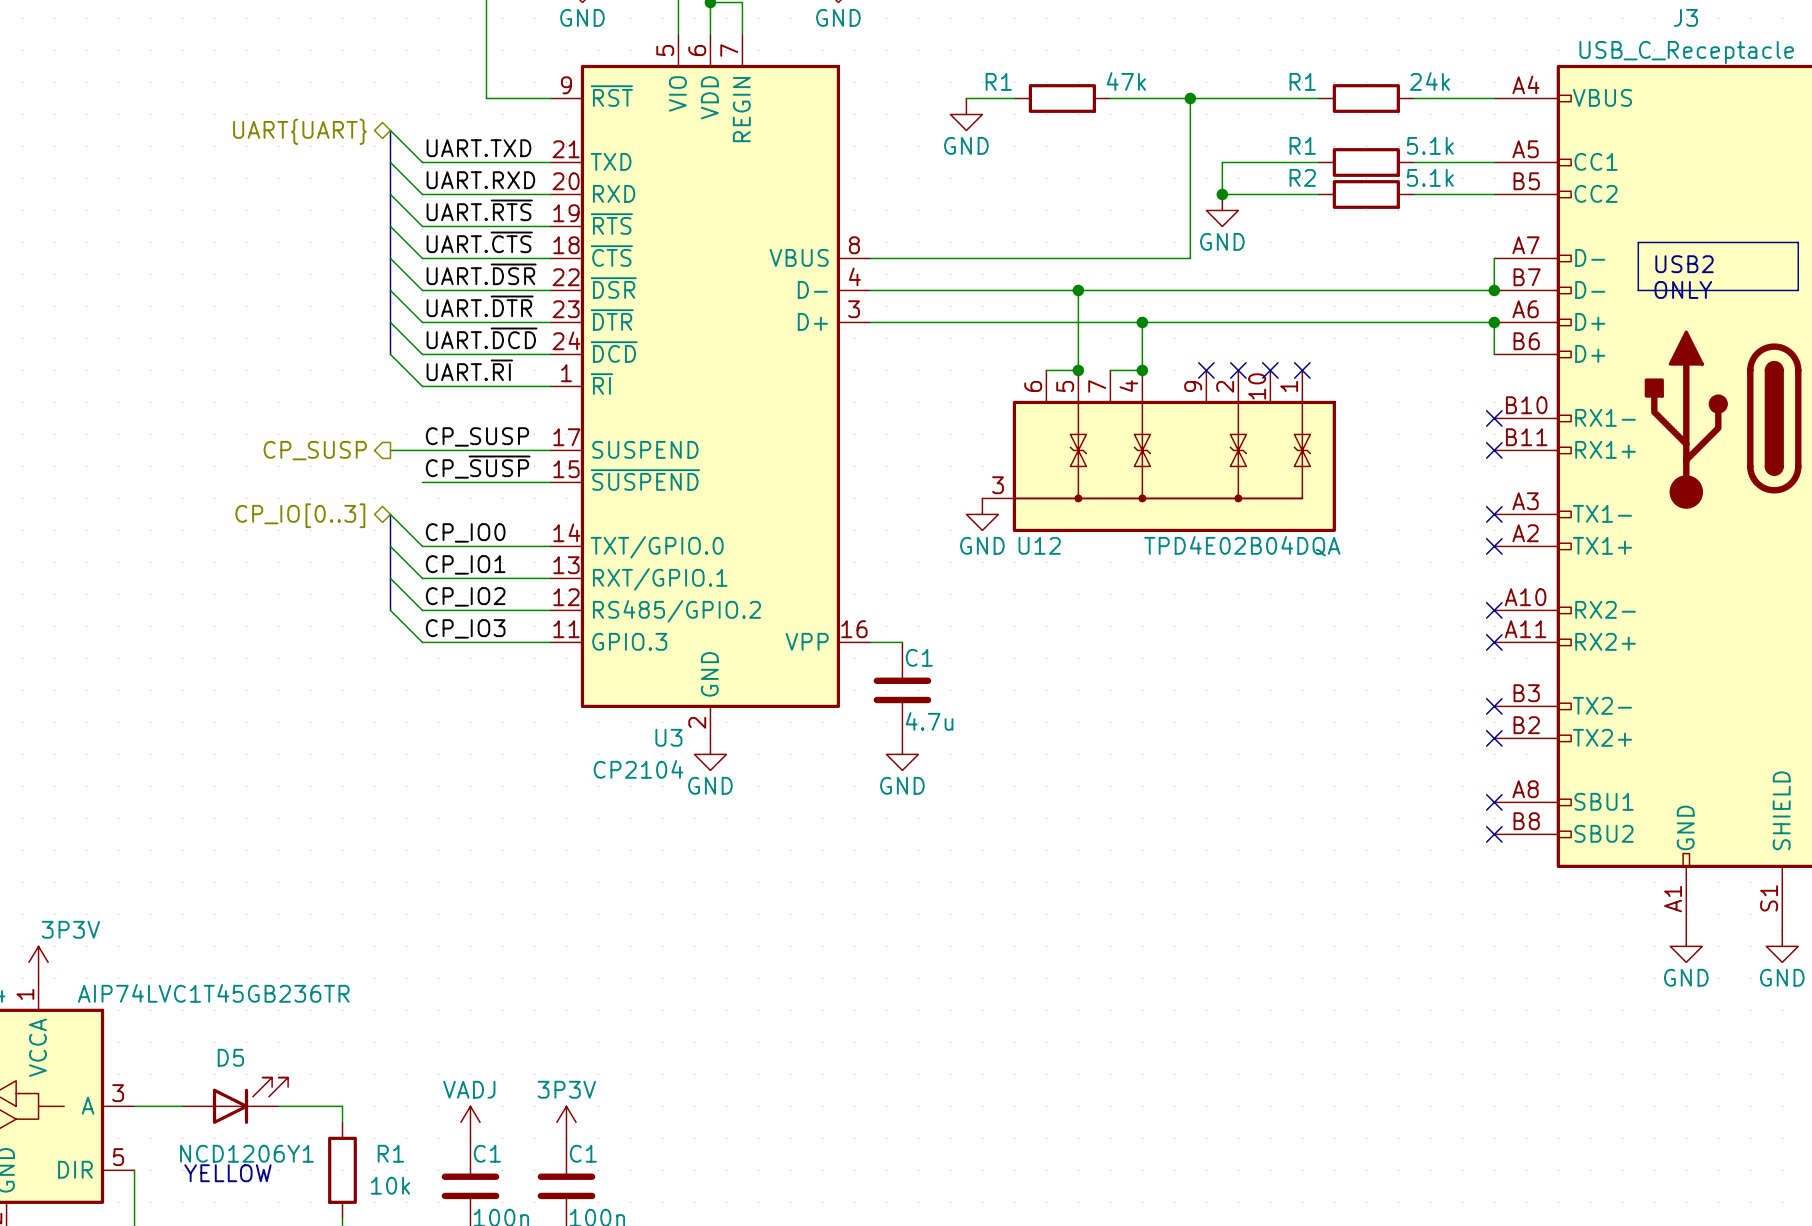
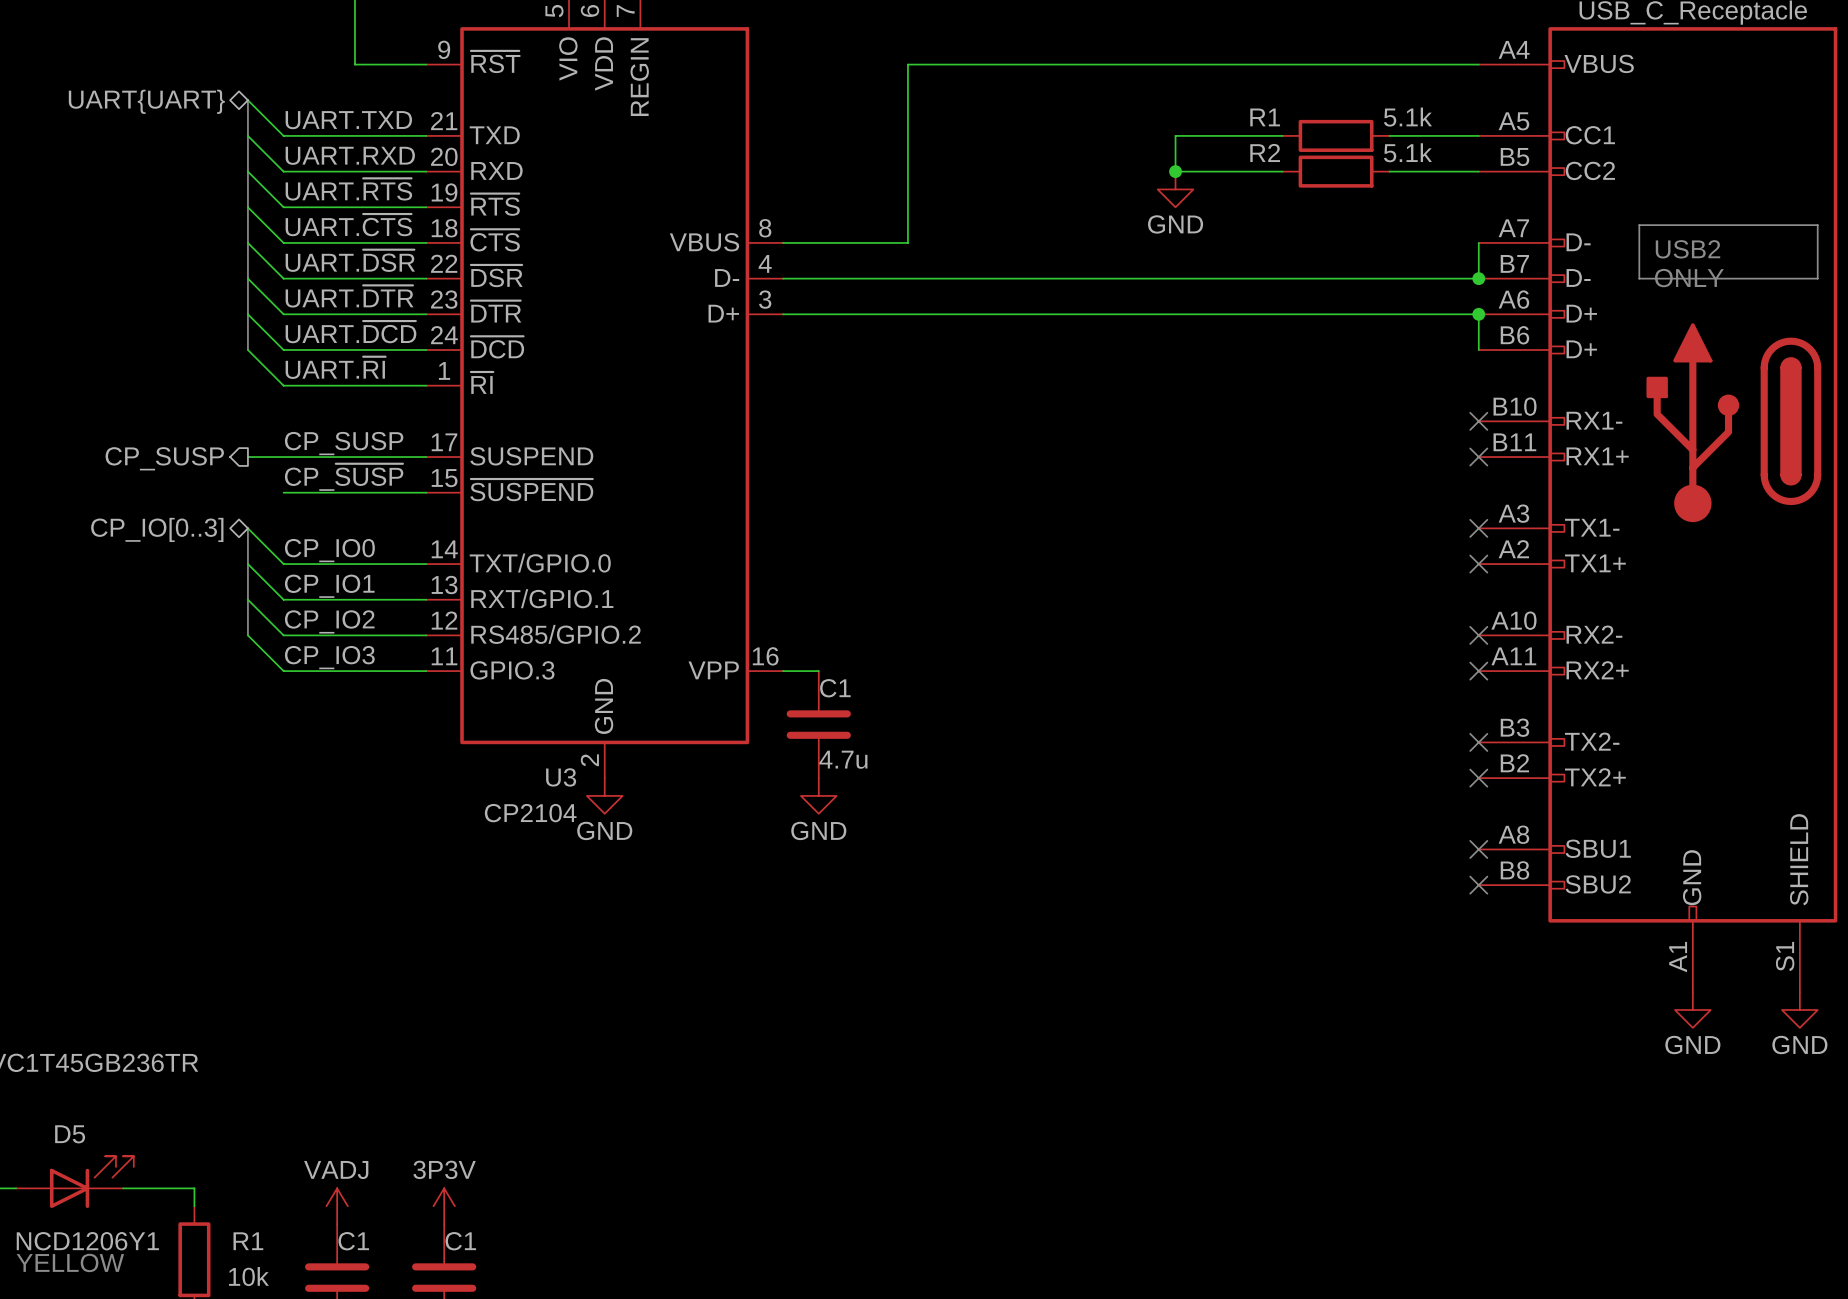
wire: (966, 98) (982, 98) -> (907, 242) (907, 64)
wire: none -> (943, 64) (1050, 64)
R1: 47k (1062, 98) -> none
wire: (1190, 98) (1190, 258) (982, 258) -> none
junction: (1190, 98) -> none
wire: none -> (1282, 64) (1389, 64)
R1: 24k (1366, 98) -> none
power symbol: GND (966, 114) -> none
wire: (1078, 290) (1078, 370) (1046, 370) -> none
junction: (1078, 290) -> none
wire: (1142, 322) (1142, 370) (1110, 370) -> none
junction: (1142, 322) -> none
junction: (1078, 370) -> none
junction: (1142, 370) -> none
no-connect mark: (1206, 370) -> none
no-connect mark: (1238, 370) -> none
no-connect mark: (1270, 370) -> none
no-connect mark: (1302, 370) -> none
U12: TPD4E02B04DQA (1159, 451) -> none
power symbol: GND (982, 514) -> none

